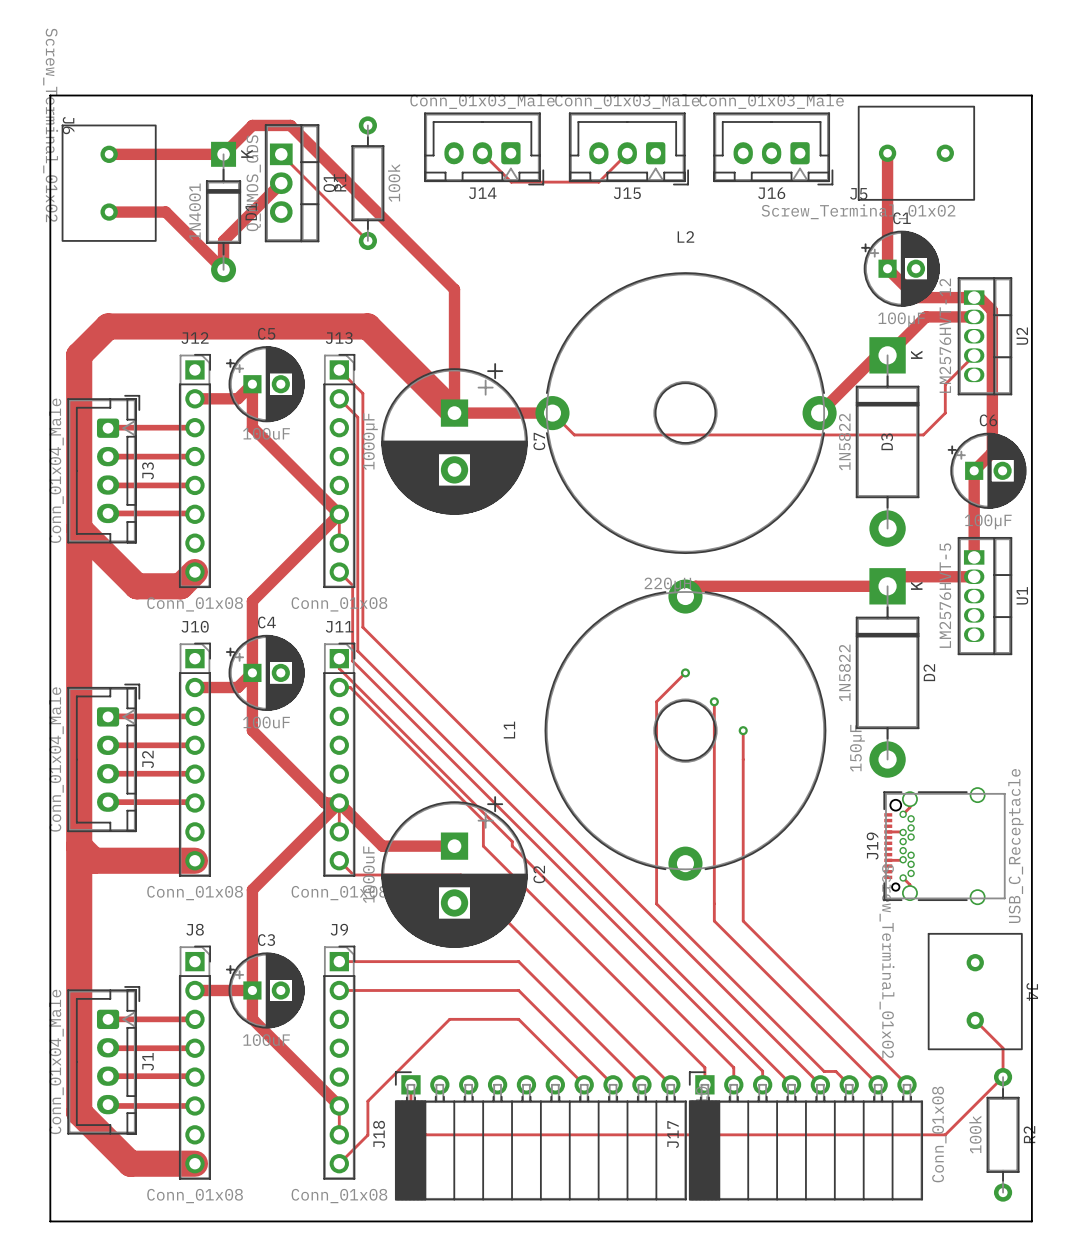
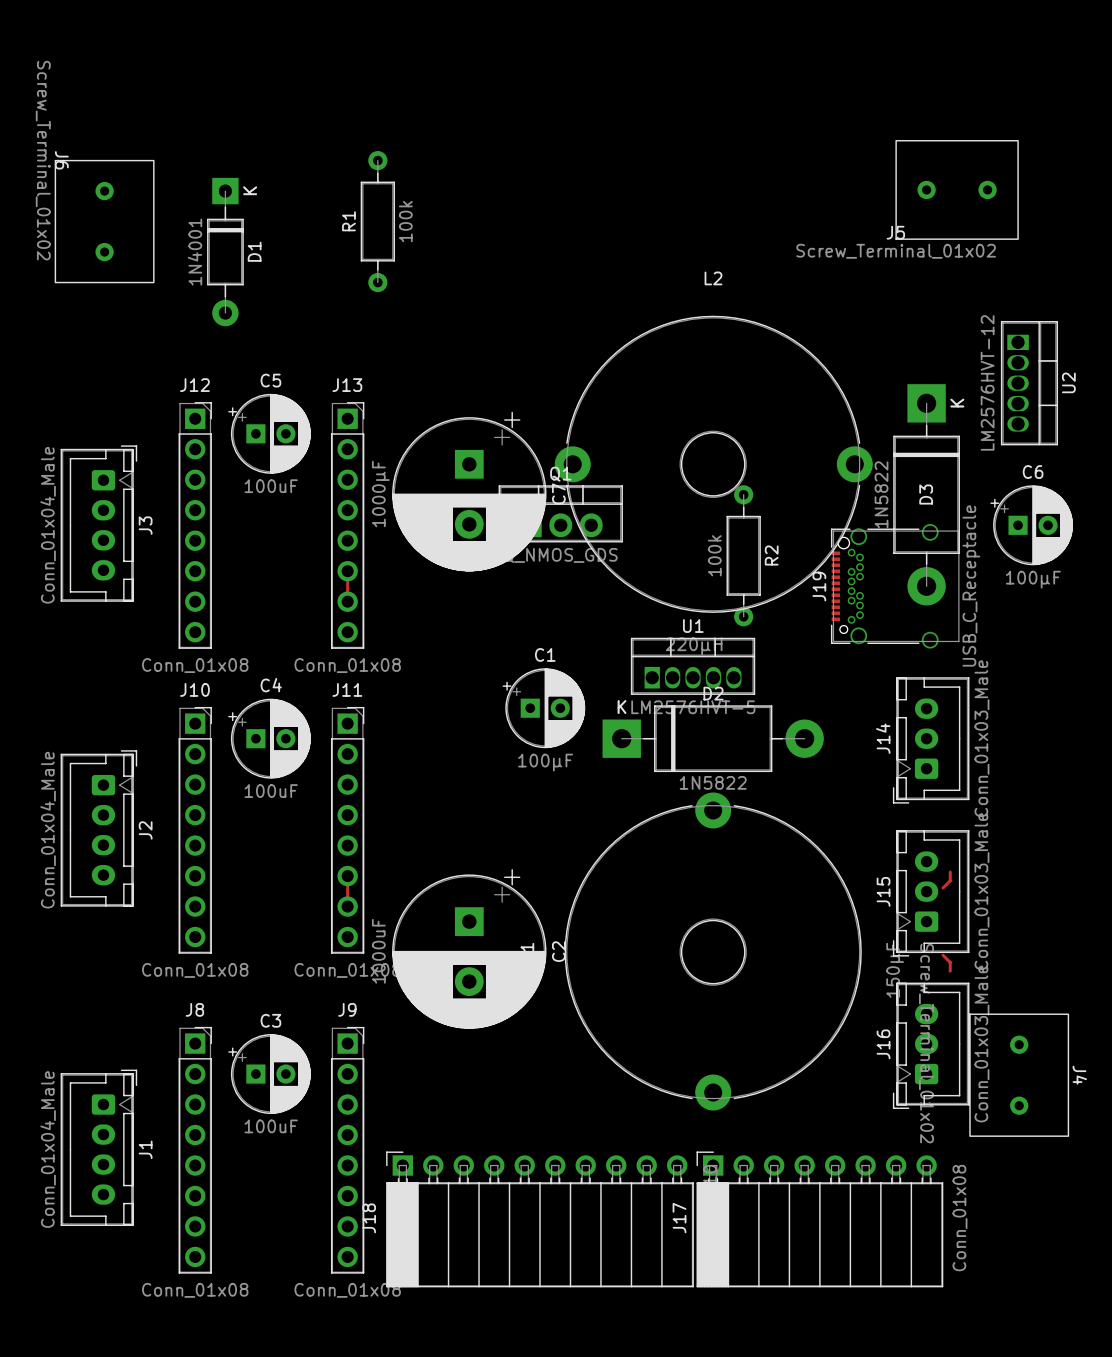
board edge: (50, 95) (1031, 95) (1031, 1221) (50, 1221) (50, 95) -> none
J14 rotation: 0° (484, 148) -> 90° clockwise (931, 740)
J14 position: (484, 148) -> (931, 740)
J15 rotation: 0° (628, 148) -> 90° clockwise (931, 893)
J15 position: (628, 148) -> (931, 893)
J16 rotation: 0° (773, 148) -> 90° clockwise (931, 1045)
J16 position: (773, 148) -> (931, 1045)
track: (482, 153) (511, 182) (598, 182) (627, 153) -> none
track: (887, 153) (887, 268) (916, 297) (979, 297) (992, 310) (992, 452) (974, 470) (974, 557) -> none
track: (109, 154) (223, 154) (252, 125) (290, 125) (454, 289) (454, 413) -> none
track: (281, 154) (367, 240) -> none
track: (281, 183) (223, 240) (223, 269) (165, 212) (109, 212) -> none
Q1 rotation: 0° (292, 183) -> 90° counterclockwise (560, 513)
Q1 position: (292, 183) -> (560, 513)
C1 position: (900, 268) -> (543, 708)
track: (974, 316) (925, 316) (887, 355) (877, 355) (819, 413) -> none
track: (974, 355) (945, 384) (945, 413) (923, 434) (574, 434) (552, 413) (454, 413) -> none
track: (339, 369) (362, 393) (362, 627) (820, 1084) -> none
track: (194, 398) (237, 398) (252, 384) (252, 427) (339, 514) (252, 601) (252, 730) (324, 803) (339, 803) -> none
track: (339, 398) (357, 417) (357, 651) (791, 1084) -> none
track: (454, 413) (367, 326) (108, 326) (79, 355) (79, 1112) (130, 1163) (194, 1163) -> none
track: (194, 427) (108, 428) -> none
track: (108, 456) (194, 456) -> none
track: (108, 485) (194, 485) -> none
track: (108, 513) (194, 514) -> none
track: (79, 528) (136, 586) (180, 586) (194, 572) -> none
track: (339, 572) (352, 585) (352, 661) (762, 1071) (762, 1084) -> none
track: (974, 576) (897, 576) (887, 586) (695, 586) (685, 596) -> none
U1 rotation: 0° (984, 596) -> 90° counterclockwise (693, 666)
U1 position: (984, 596) -> (693, 666)
track: (339, 658) (339, 668) (512, 841) (512, 846) (733, 1067) (733, 1084) -> none
track: (252, 672) (237, 687) (194, 687) -> none
track: (685, 672) (656, 701) (656, 903) (824, 1071) (835, 1071) (849, 1084) -> none
via: (685, 672) -> none
D2 rotation: 0° (887, 672) -> 90° counterclockwise (713, 738)
D2 position: (887, 672) -> (713, 738)
track: (339, 687) (350, 687) (483, 820) (483, 846) (704, 1067) (704, 1084) -> none
track: (714, 701) (714, 921) (878, 1084) -> none
via: (714, 701) -> none
track: (194, 716) (108, 716) -> none
L1 position: (685, 730) -> (713, 951)
track: (743, 730) (743, 921) (907, 1084) -> none
via: (743, 730) -> none
track: (108, 745) (194, 745) -> none
track: (108, 773) (194, 774) -> none
track: (108, 802) (194, 803) -> none
track: (339, 803) (252, 889) (252, 1019) (339, 1105) (339, 1134) -> none
track: (339, 803) (382, 846) (454, 846) -> none
track: (888, 831) (903, 832) -> none
track: (79, 846) (93, 860) (194, 860) -> none
J19 position: (944, 846) -> (895, 586)
track: (903, 859) (888, 860) -> none
track: (339, 860) (353, 875) (460, 875) (670, 1084) -> none
track: (339, 961) (518, 961) (641, 1084) -> none
track: (194, 990) (252, 990) -> none
track: (339, 990) (518, 990) (613, 1084) -> none
track: (108, 1019) (194, 1019) -> none
track: (975, 1020) (1003, 1048) (1003, 1077) (945, 1134) (425, 1134) (410, 1120) (410, 1084) -> none
track: (108, 1047) (194, 1047) -> none
track: (108, 1076) (194, 1077) -> none
track: (584, 1084) (518, 1019) (449, 1019) (367, 1101) (367, 1135) (339, 1163) -> none
track: (193, 1104) (194, 1105) (108, 1105) -> none
R2 position: (1003, 1134) -> (743, 555)
J18 position: (540, 1135) -> (540, 1219)
J17 position: (805, 1135) -> (819, 1219)

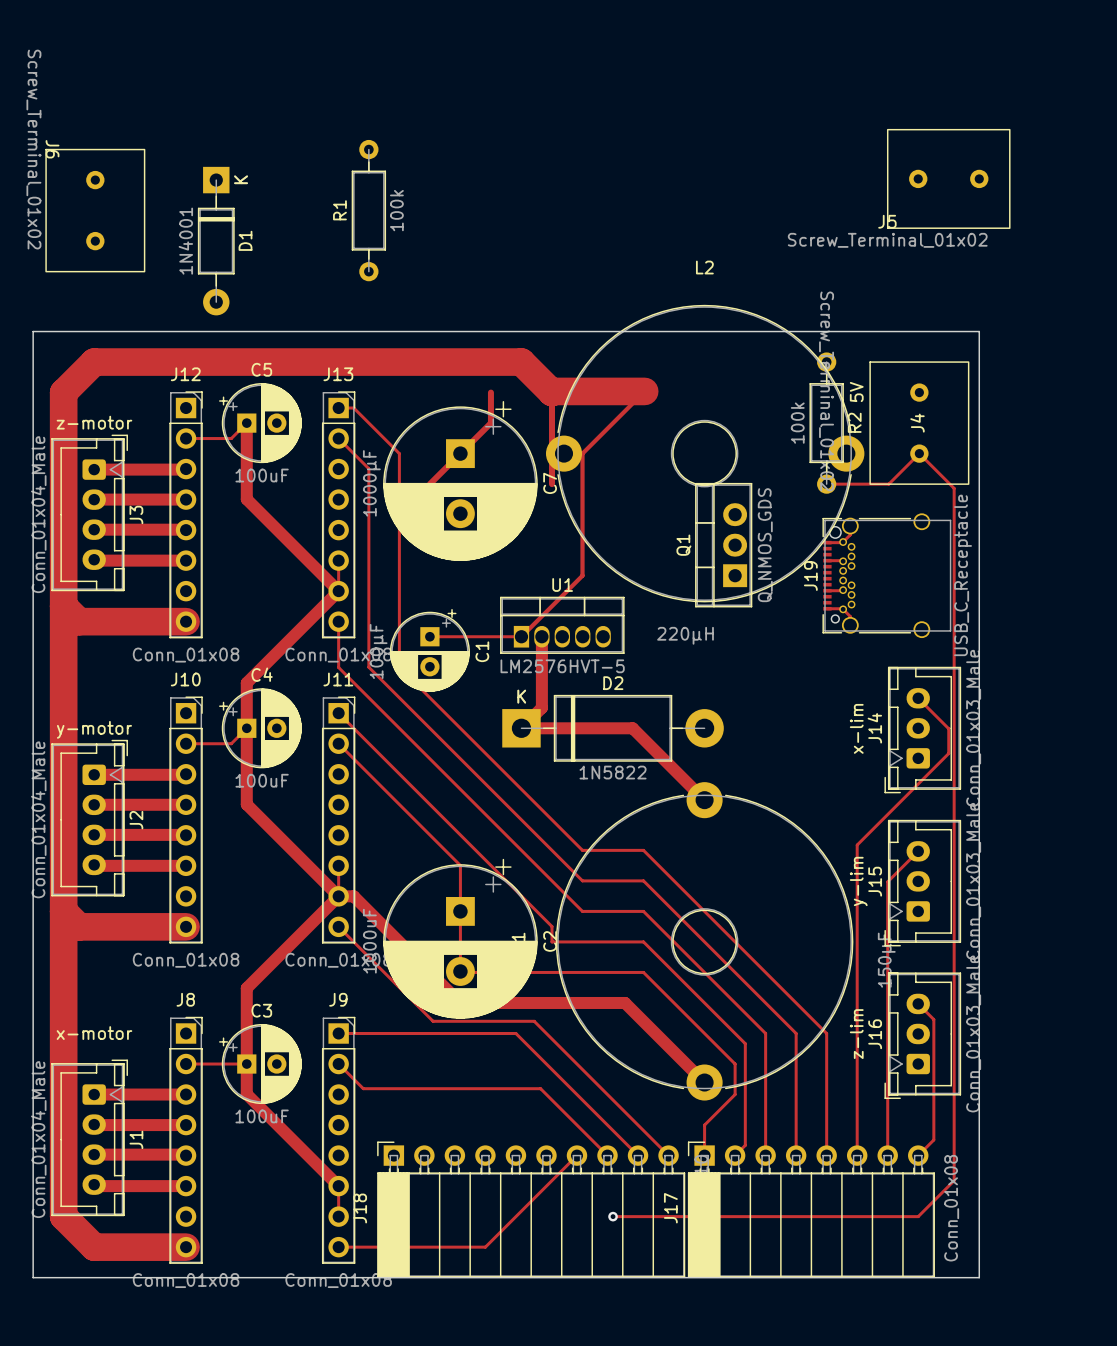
board edge: none -> (33, 331) (979, 331) (979, 1277) (33, 1277) (33, 331)
U2: LM2576HVT-12 (1029, 383) -> none
text: none -> 5V (856, 392)
track: none -> (490, 392) (490, 423) (429, 484)
track: none -> (551, 392) (551, 484)
track: none -> (551, 392) (521, 362) (94, 362) (63, 392) (63, 1216) (94, 1247) (186, 1247)
track: none -> (551, 392) (644, 391) (582, 453) (582, 575) (521, 636) (429, 636)
track: none -> (338, 408) (353, 408) (399, 453) (399, 667) (582, 850) (643, 850) (826, 1033) (826, 1155)
text: none -> z-motor (94, 422)
track: none -> (186, 438) (231, 438) (246, 423) (246, 499) (338, 591) (246, 683) (246, 804) (338, 896)
track: none -> (338, 438) (368, 468) (368, 667) (582, 880) (643, 880) (796, 1033) (796, 1155)
track: none -> (186, 469) (94, 469)
track: none -> (826, 484) (888, 484) (919, 453) (954, 488) (954, 1180) (918, 1216) (613, 1216)
D3: 1N5822 (926, 494) -> none
track: none -> (94, 499) (186, 499)
Q1 rotation: 0° (560, 513) -> 90° counterclockwise (723, 545)
Q1 position: (560, 513) -> (723, 545)
C6: 100µF (1031, 525) -> none
track: none -> (850, 526) (850, 534) (842, 542) (827, 542)
track: none -> (94, 529) (186, 530)
R2 position: (743, 555) -> (826, 423)
track: none -> (94, 559) (186, 560)
track: none -> (827, 560) (843, 561)
track: none -> (843, 590) (827, 590)
track: none -> (63, 606) (79, 621) (186, 621)
track: none -> (827, 608) (842, 608) (850, 616) (850, 625)
track: none -> (338, 621) (338, 667) (582, 911) (643, 911) (765, 1033) (765, 1155)
track: none -> (541, 636) (541, 707) (521, 728) (632, 728) (704, 800)
U1 position: (693, 666) -> (562, 625)
C1 rotation: 0° (543, 708) -> 90° clockwise (429, 650)
C1 position: (543, 708) -> (429, 650)
track: none -> (918, 698) (948, 728) (948, 753) (857, 845) (857, 1155)
track: none -> (338, 713) (551, 926) (551, 941) (643, 941) (745, 1043) (745, 1145) (735, 1155)
track: none -> (246, 728) (231, 743) (186, 743)
D2 position: (713, 738) -> (613, 728)
text: none -> x-lim (856, 728)
text: none -> y-motor (94, 729)
track: none -> (338, 743) (460, 865) (460, 972) (643, 972) (735, 1064) (735, 1094) (704, 1125) (704, 1155)
track: none -> (186, 774) (94, 774)
track: none -> (94, 804) (186, 804)
track: none -> (94, 834) (186, 835)
track: none -> (918, 851) (887, 881) (887, 1155)
track: (950, 872) (950, 880) (943, 888) -> none
track: none -> (94, 864) (186, 865)
text: none -> y-lim (858, 881)
track: none -> (338, 896) (353, 896) (460, 1002) (625, 1002) (704, 1082)
track: none -> (338, 896) (246, 988) (246, 1094) (338, 1186) (338, 1216)
track: none -> (63, 911) (79, 926) (186, 926)
track: none -> (338, 926) (433, 1021) (534, 1021) (668, 1155)
track: (943, 955) (950, 962) (950, 971) -> none
track: none -> (918, 1003) (933, 1019) (933, 1139) (918, 1155)
text: none -> x-motor (94, 1033)
track: none -> (338, 1033) (515, 1033) (638, 1155)
text: none -> z-lim (856, 1034)
track: none -> (186, 1064) (246, 1064)
track: none -> (338, 1064) (363, 1088) (540, 1088) (607, 1155)
J4 position: (1019, 1075) -> (919, 423)
J4 name rotation: 0° (1079, 1075) -> 180° (917, 423)
J4 name position: J4 (1079, 1075) -> J4 (917, 423)
track: none -> (94, 1094) (186, 1094)
track: none -> (94, 1124) (186, 1125)
track: none -> (94, 1154) (186, 1155)
track: none -> (576, 1155) (485, 1247) (338, 1247)
track: none -> (94, 1184) (186, 1186)
via: none -> (613, 1216)

